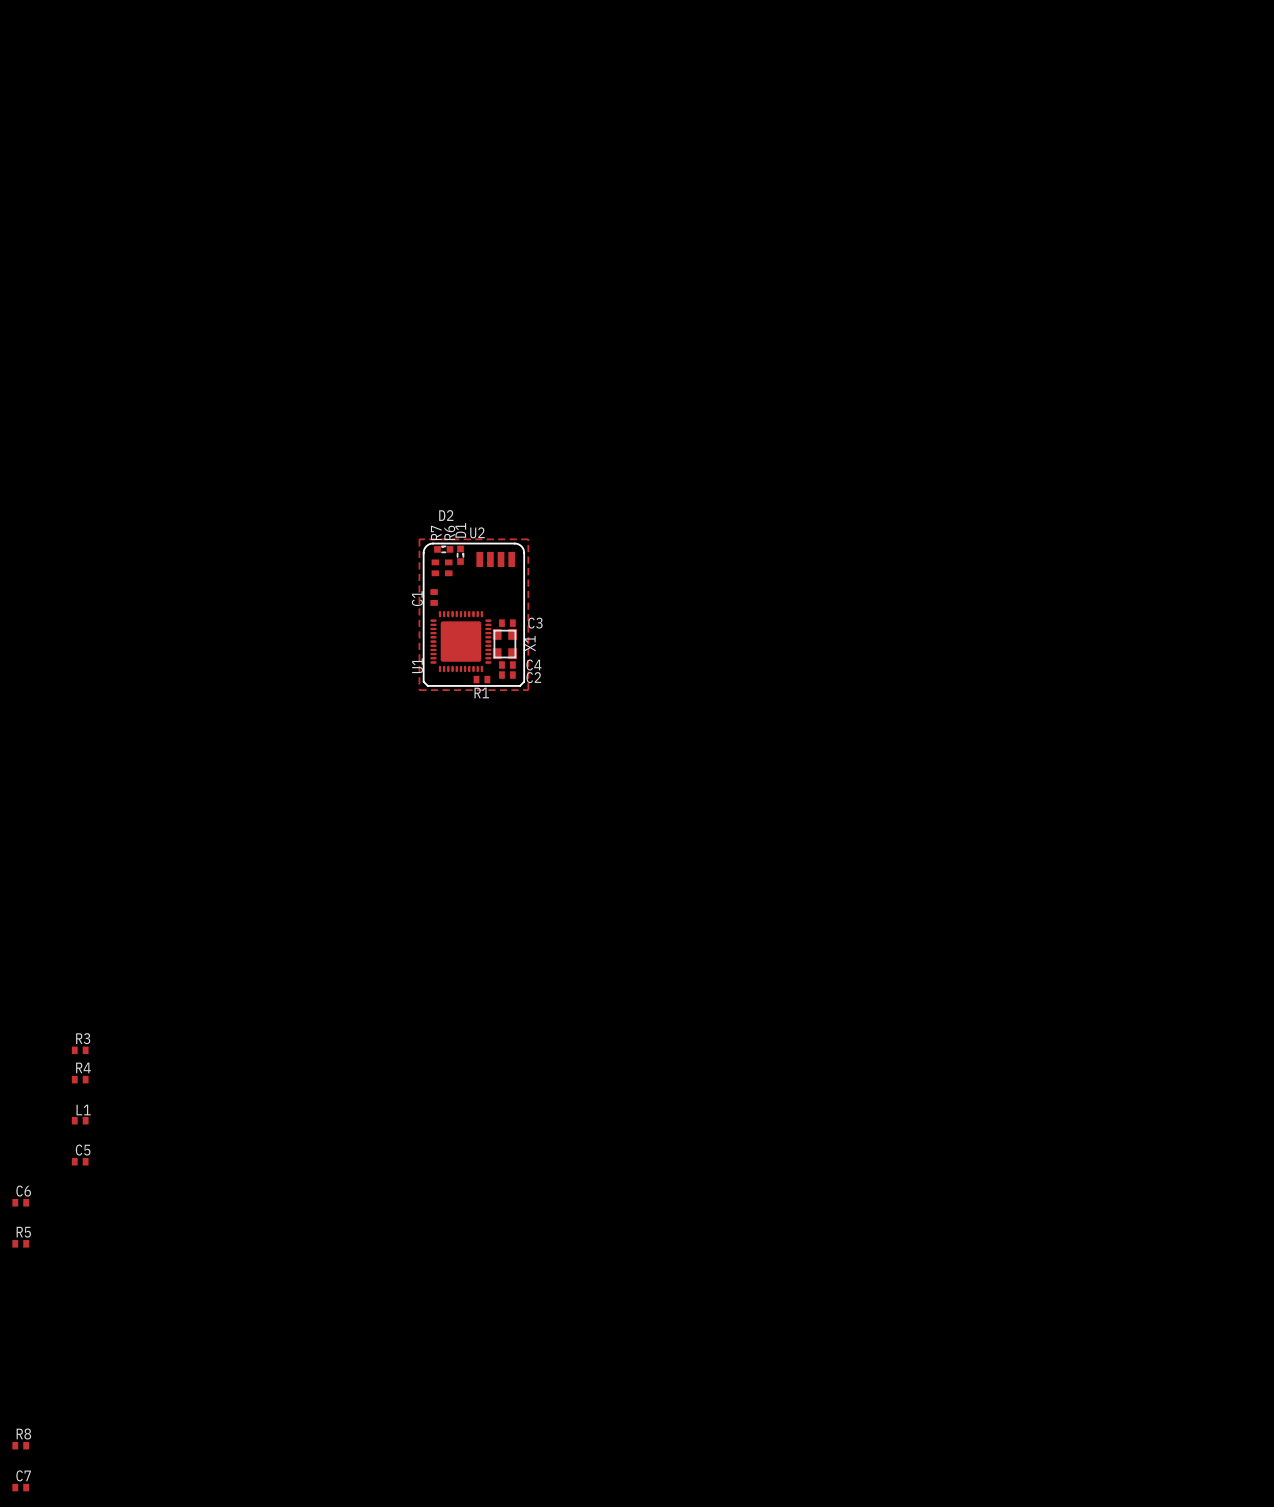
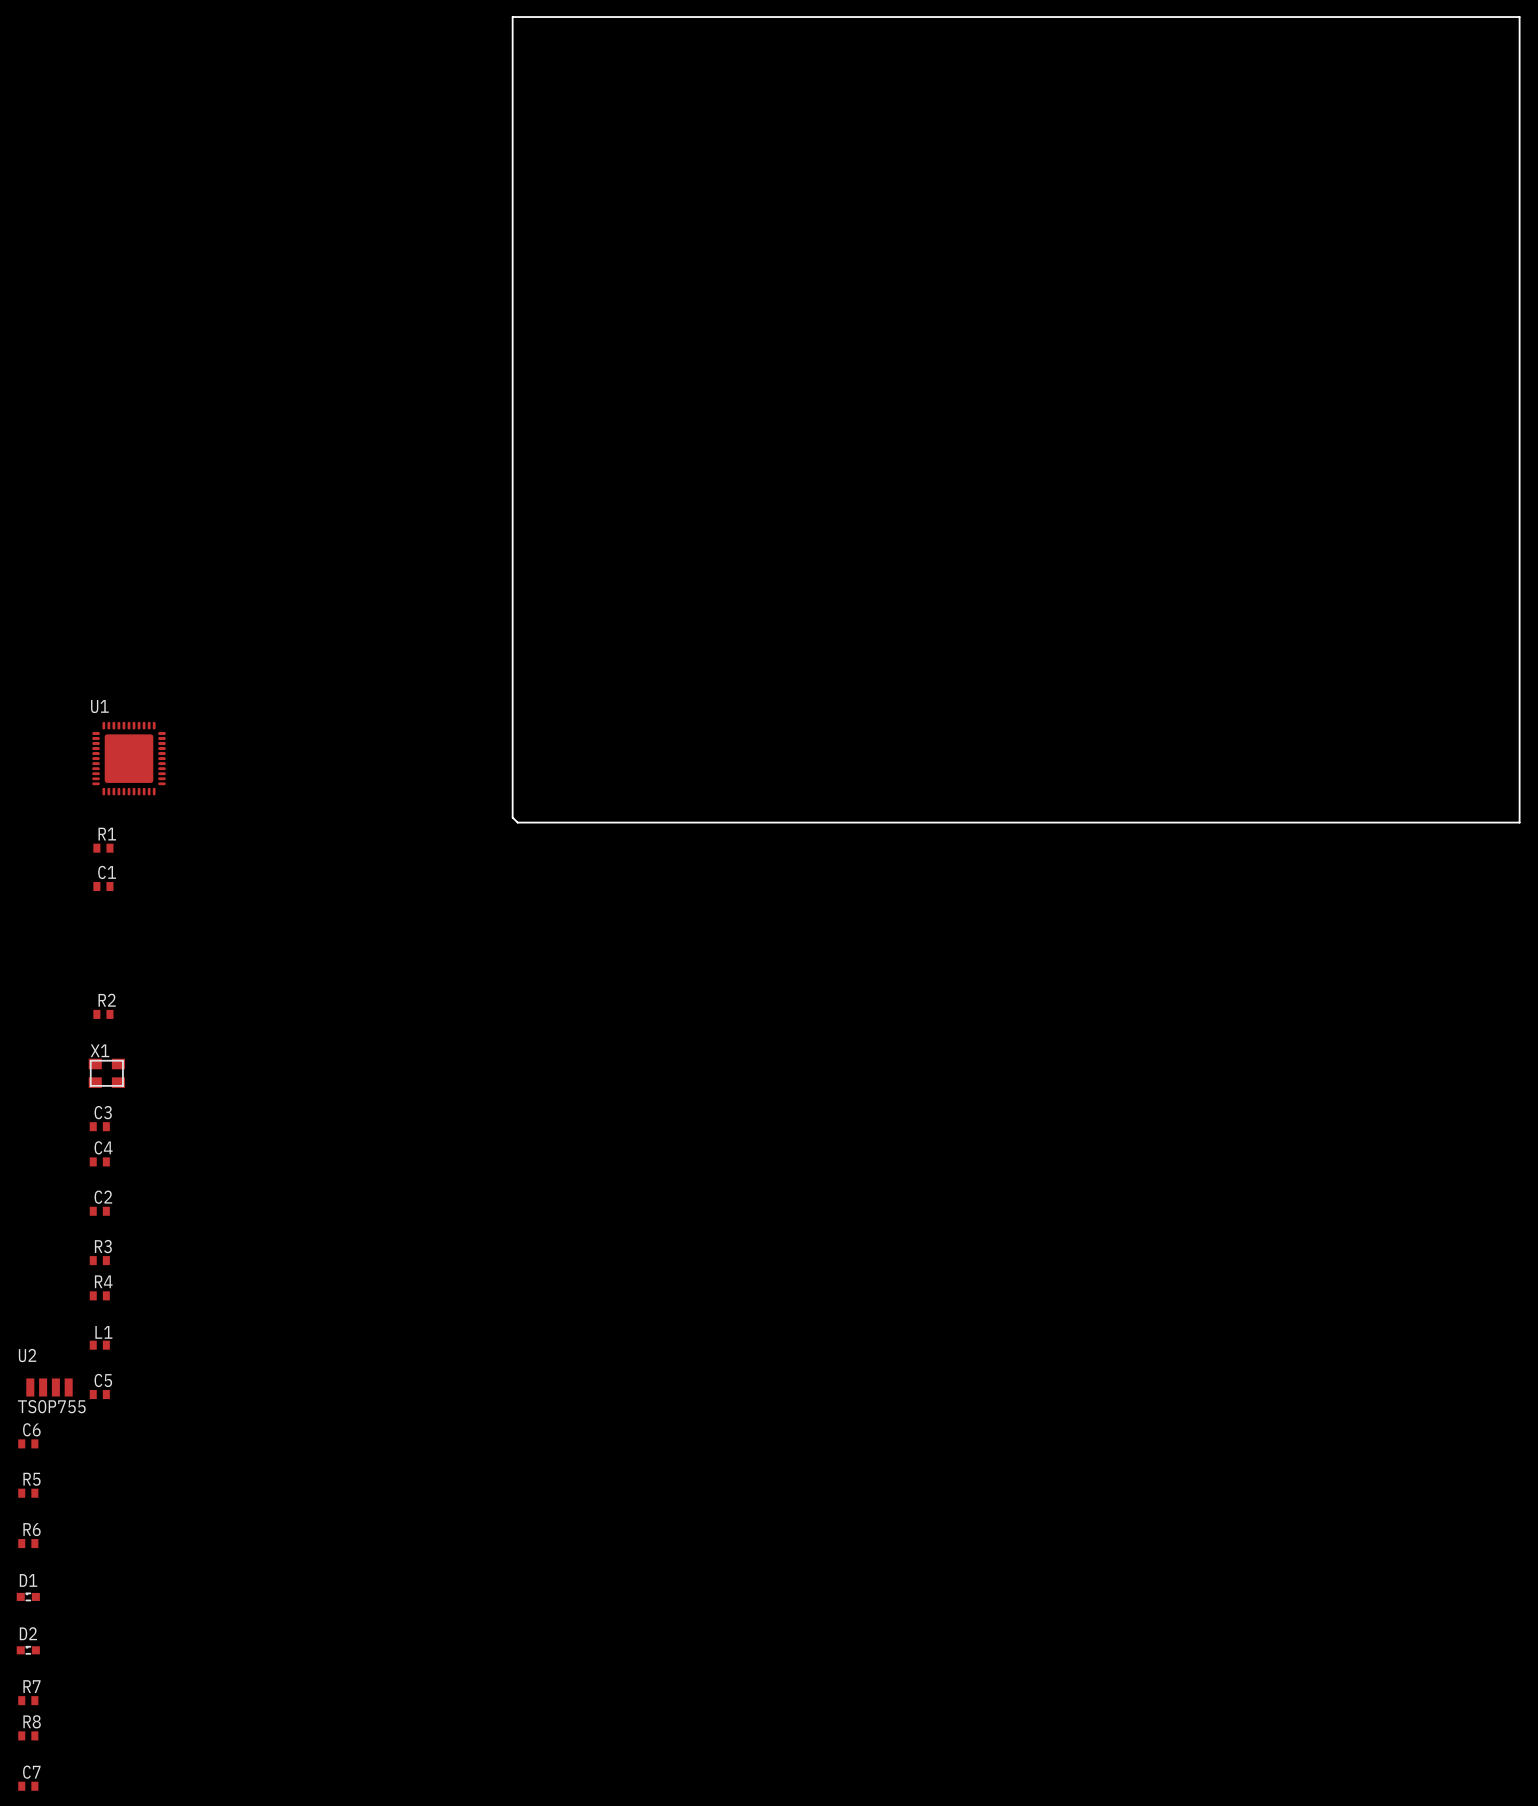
D2 name position: D2 (446, 515) -> D2 (28, 1633)
R7 name position: R7 (436, 532) -> R7 (31, 1686)
R6 name position: R6 (449, 532) -> R6 (32, 1529)
top zone outline: (419, 539) (419, 690) (528, 690) (528, 539) (419, 539) -> none
D2 position: (443, 549) -> (28, 1650)
board edge: (423, 552) (426, 546) (433, 543) (514, 543) (522, 547) (524, 552) (524, 681) (519, 685) -> (512, 662) (512, 17) (1519, 17) (1519, 822) (628, 822)
D1 rotation: 0° (460, 555) -> 90° counterclockwise (28, 1596)
D1 position: (460, 555) -> (28, 1596)
U2 position: (495, 559) -> (49, 1387)
R7 rotation: 0° (435, 567) -> 90° clockwise (28, 1700)
R7 position: (435, 567) -> (28, 1700)
R6 rotation: 0° (448, 567) -> 90° clockwise (28, 1543)
R6 position: (448, 567) -> (28, 1543)
C1 rotation: 0° (434, 597) -> 90° clockwise (103, 886)
C1 position: (434, 597) -> (103, 886)
C3 position: (507, 623) -> (99, 1126)
C3 name position: C3 (535, 623) -> C3 (103, 1112)
U1 position: (460, 641) -> (129, 758)
X1 name position: X1 (530, 643) -> X1 (99, 1050)
X1 rotation: 0° (504, 644) -> 90° clockwise (106, 1073)
X1 position: (504, 644) -> (106, 1073)
U1 name rotation: 0° (417, 665) -> 90° clockwise (99, 706)
U1 name position: U1 (417, 665) -> U1 (99, 706)
C4 position: (507, 665) -> (99, 1161)
C4 name position: C4 (533, 665) -> C4 (103, 1147)
C2 position: (507, 675) -> (99, 1211)
C2 name position: C2 (533, 677) -> C2 (103, 1197)
R1 position: (481, 679) -> (103, 848)
R1 name position: R1 (481, 693) -> R1 (107, 834)
R2: none -> (103, 1014)
U2 value: none -> TSOP755 (51, 1406)

